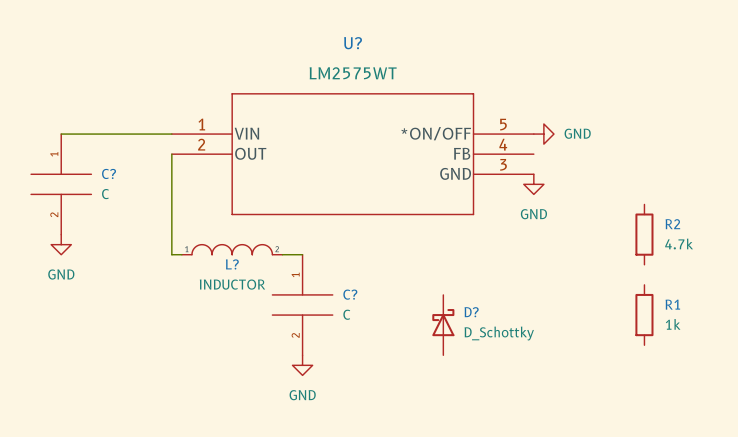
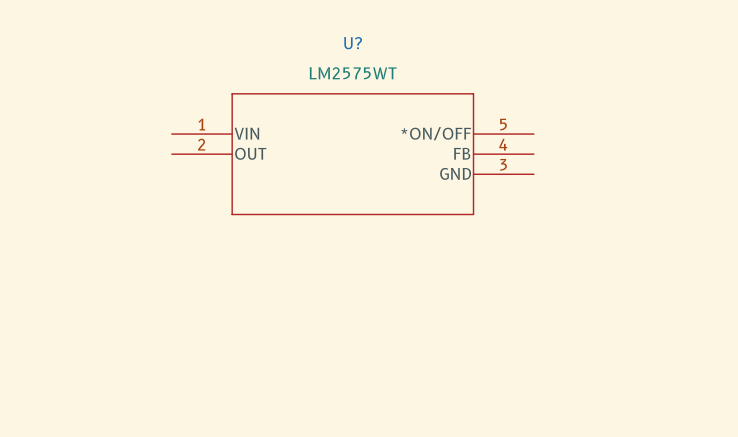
wire: (61, 134) (171, 134) -> none
power symbol: GND (543, 134) -> none
wire: (171, 154) (171, 254) (181, 254) -> none
C?: C (61, 184) -> none
power symbol: GND (533, 184) -> none
R2: 4.7k (644, 234) -> none
power symbol: GND (61, 244) -> none
L?: INDUCTOR (232, 249) -> none
wire: (282, 254) (302, 254) -> none
C?: C (302, 304) -> none
R1: 1k (644, 315) -> none
D?: D_Schottky (443, 325) -> none
power symbol: GND (302, 365) -> none

